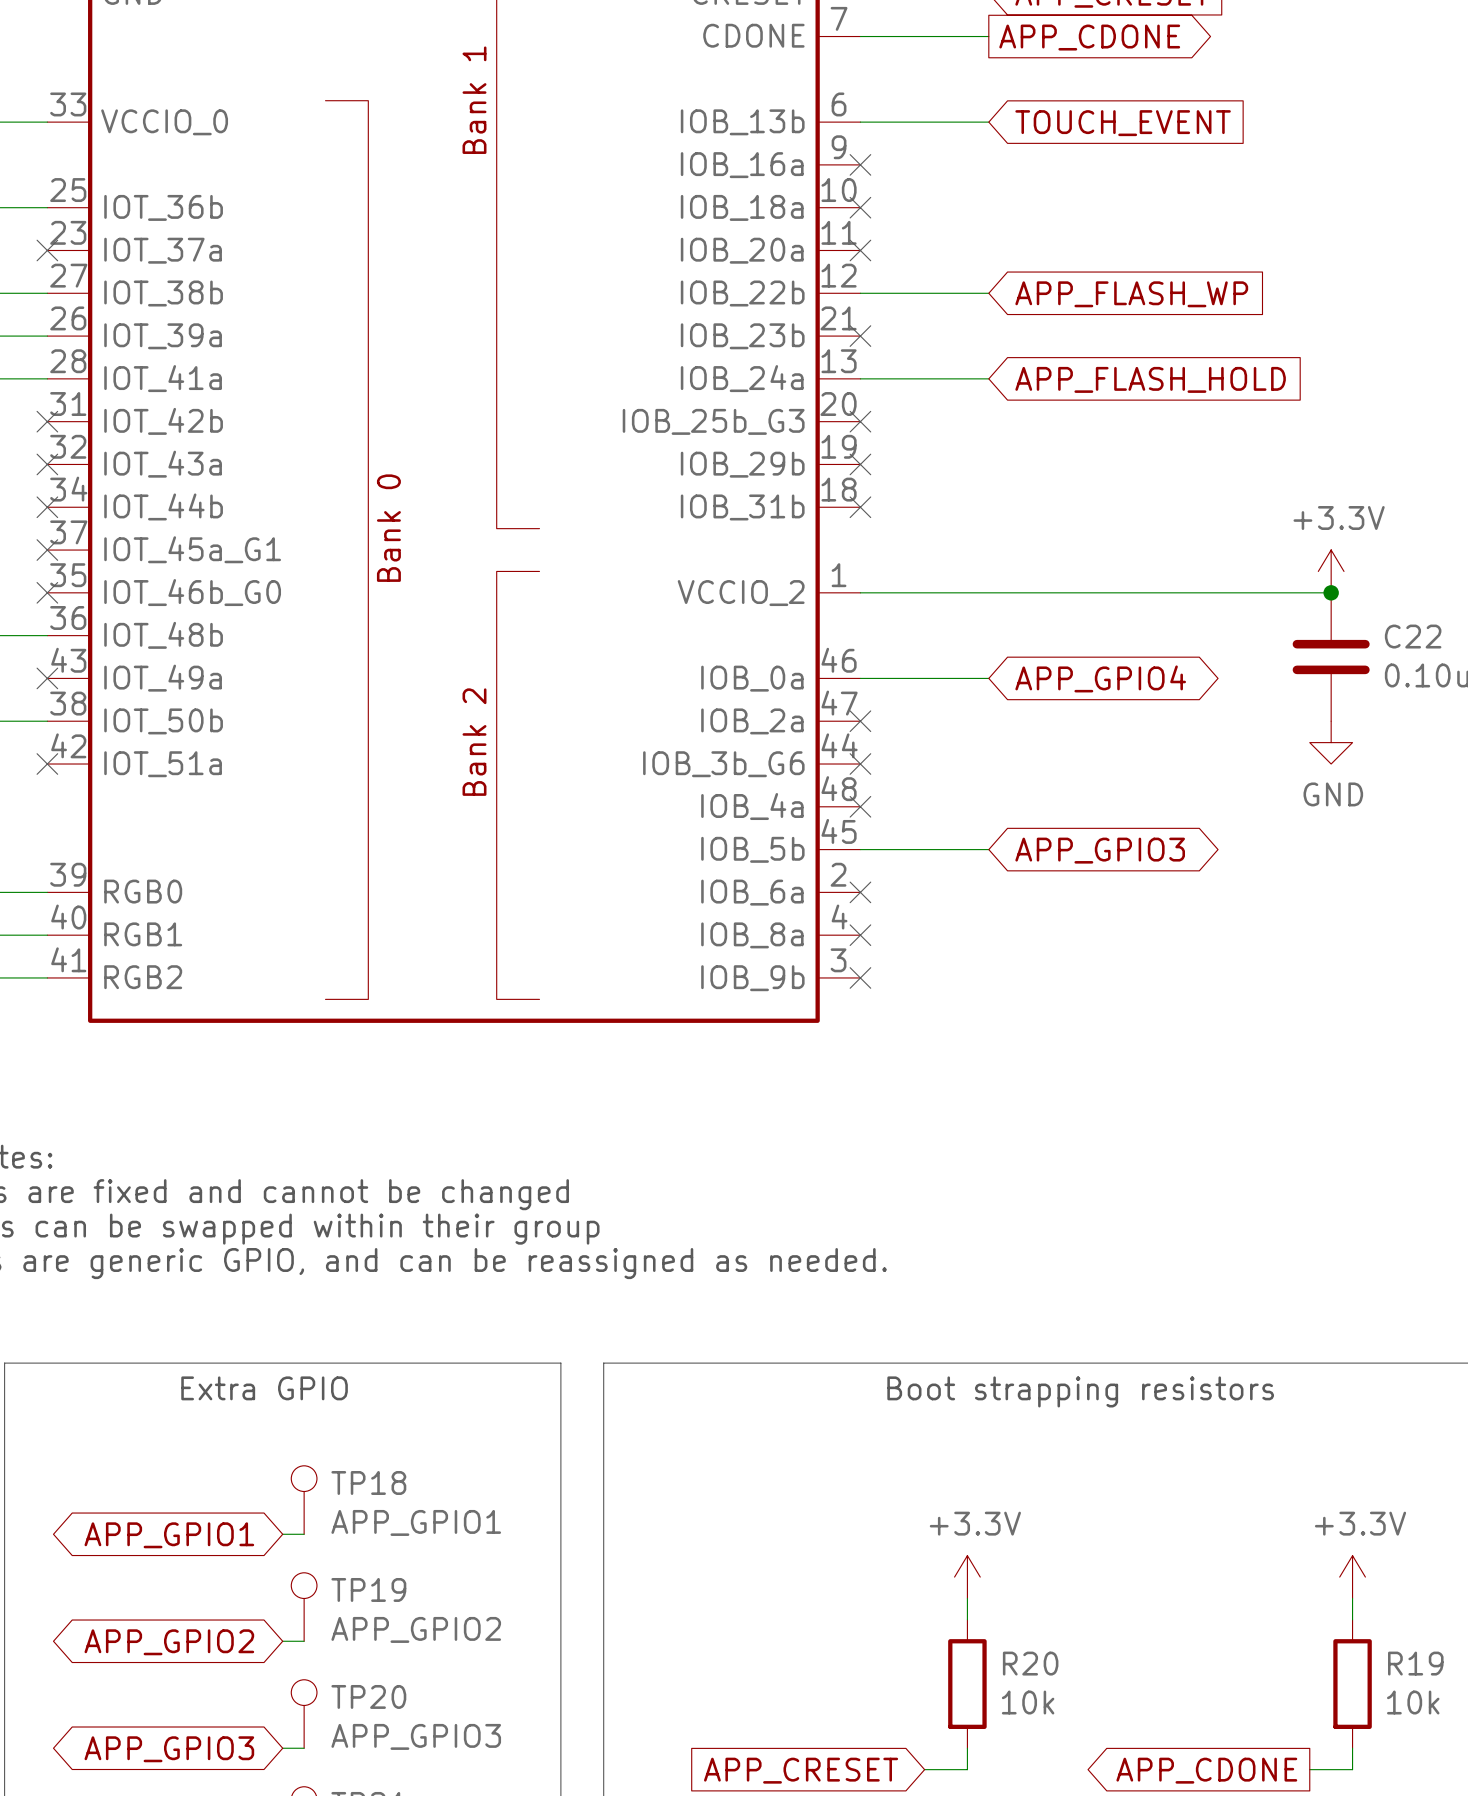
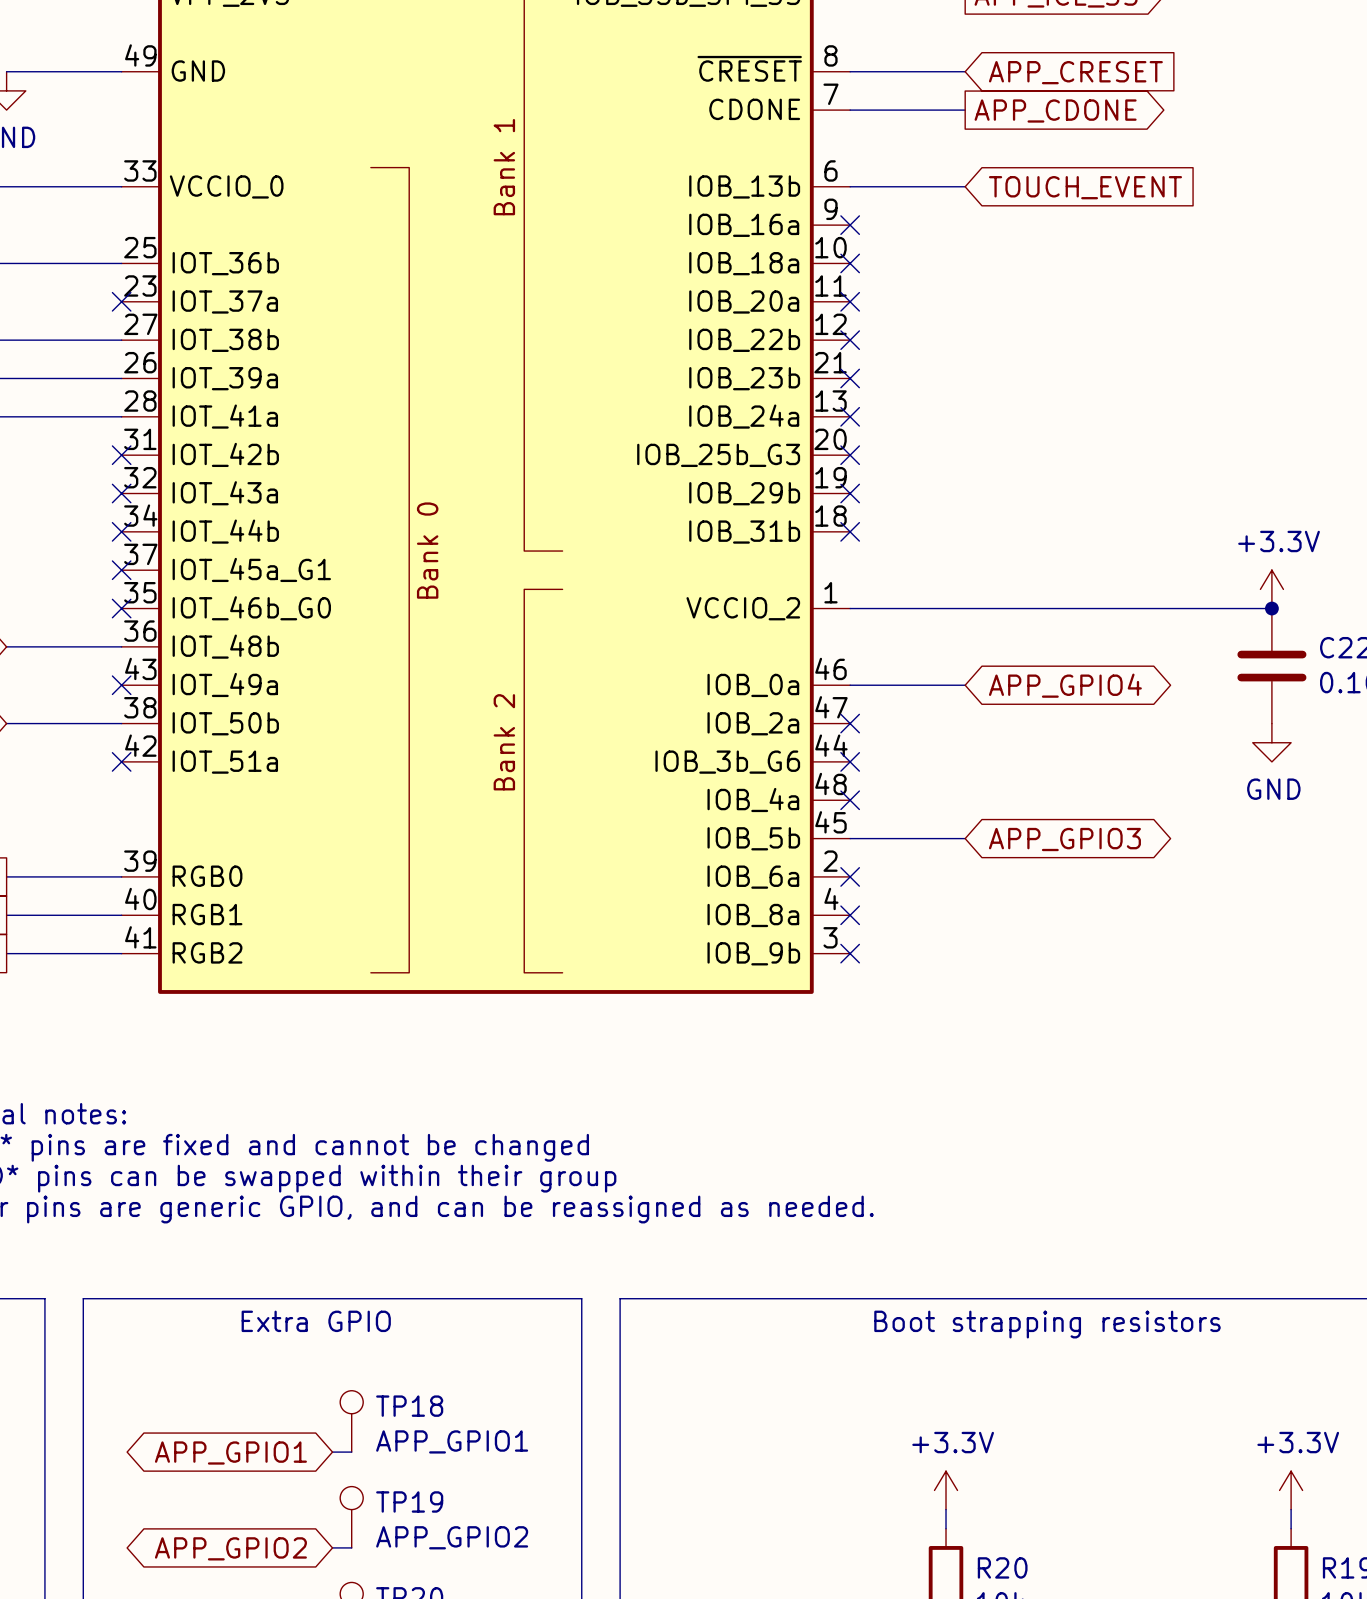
wire: (860, 293) (988, 293) -> none
no-connect mark: none -> (850, 340)
global label: APP_FLASH_WP (1131, 294) -> none
wire: (860, 378) (988, 378) -> none
no-connect mark: none -> (850, 416)
global label: APP_FLASH_HOLD (1150, 379) -> none

